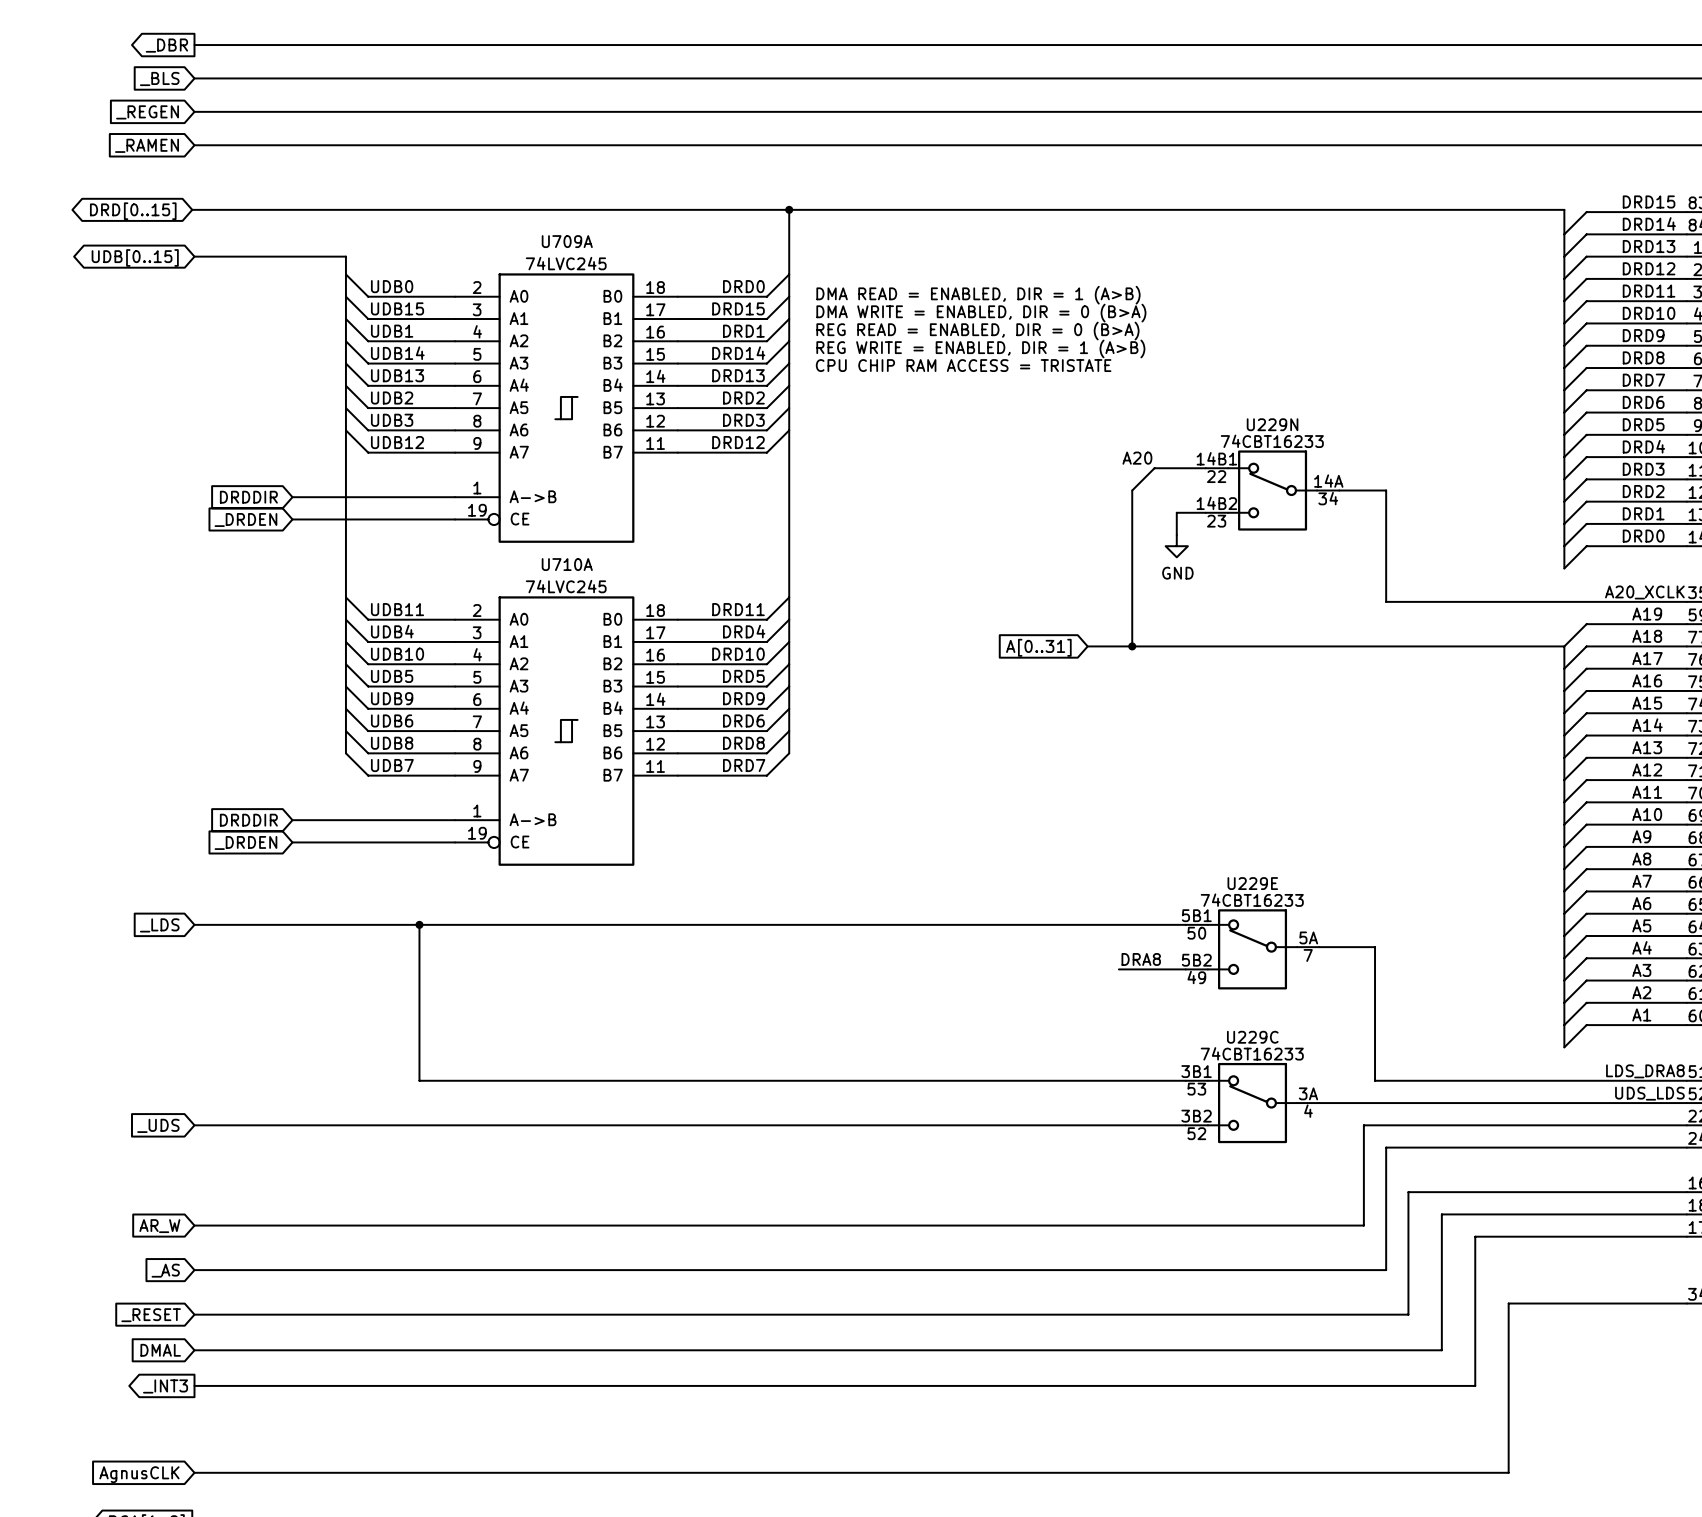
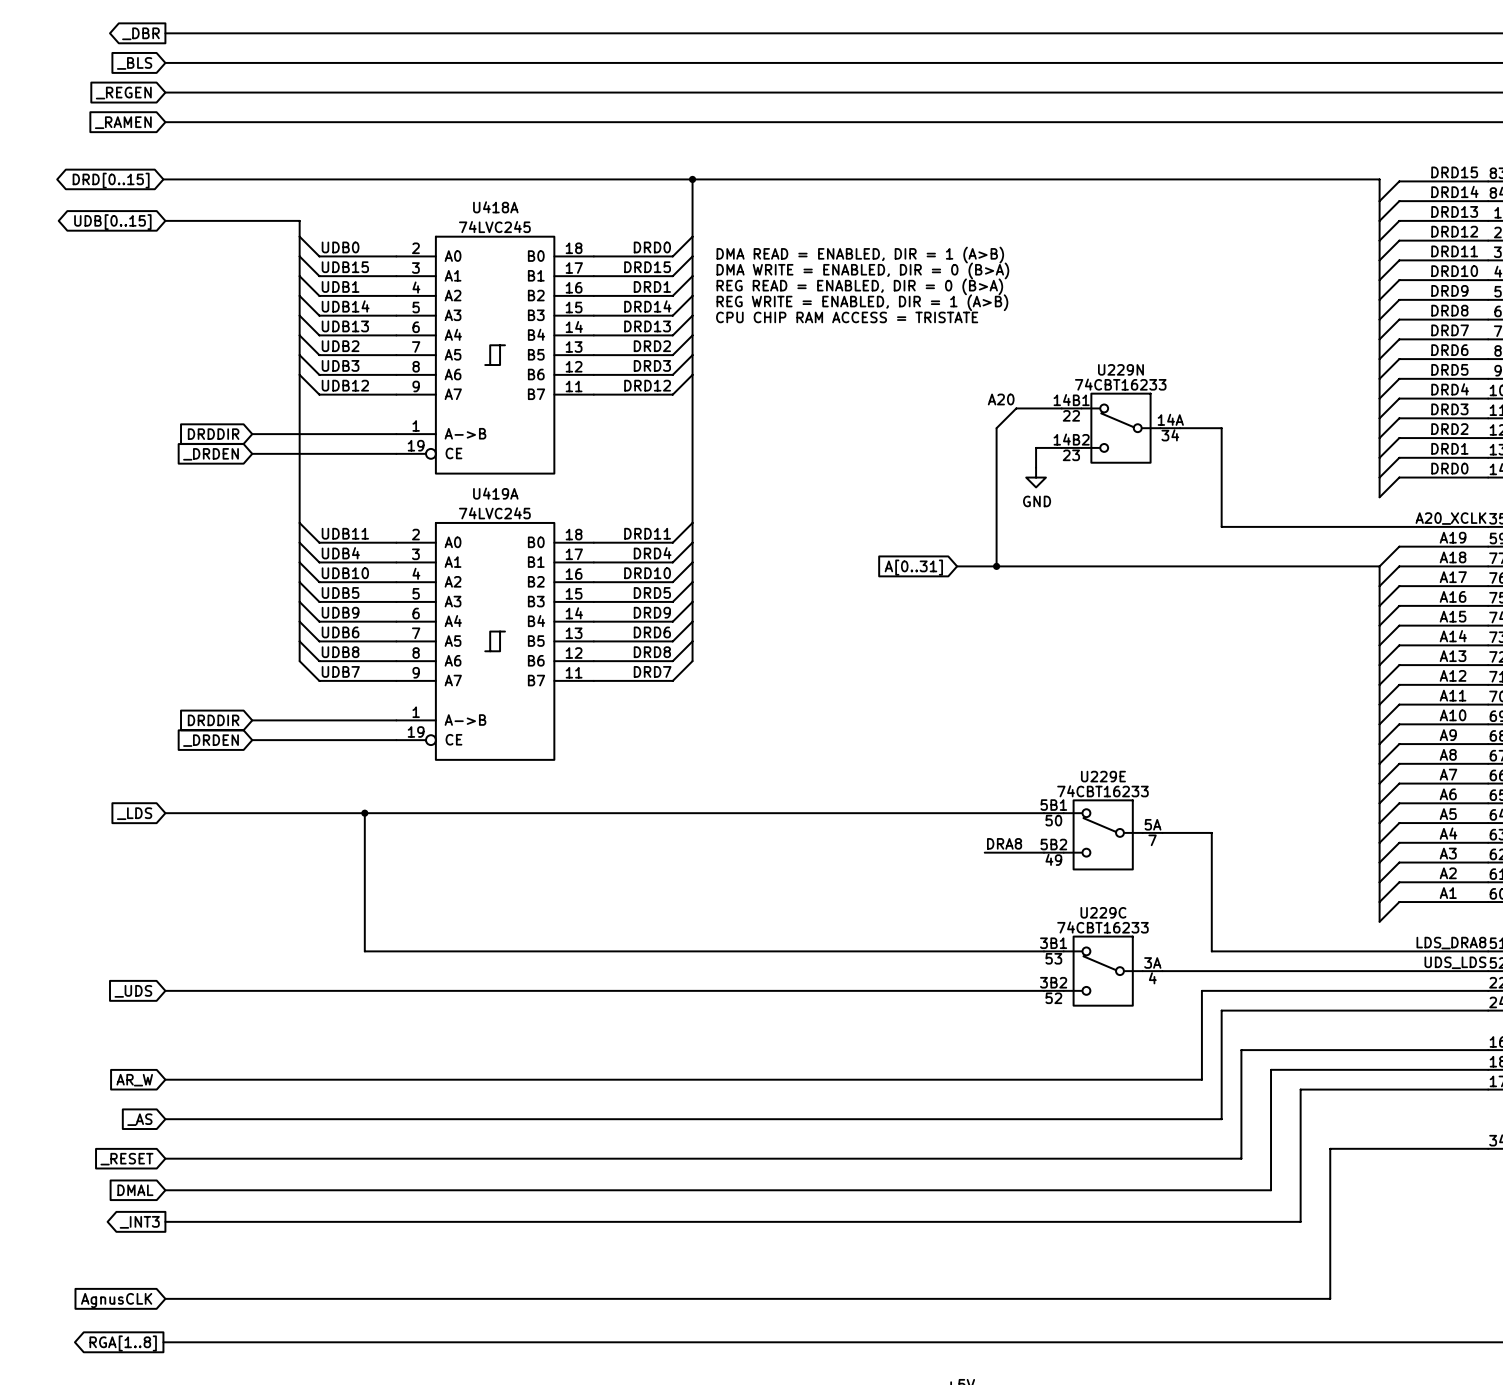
U709A name: U709A (567, 241) -> U418A (495, 207)
U710A name: U710A (567, 564) -> U419A (495, 493)

